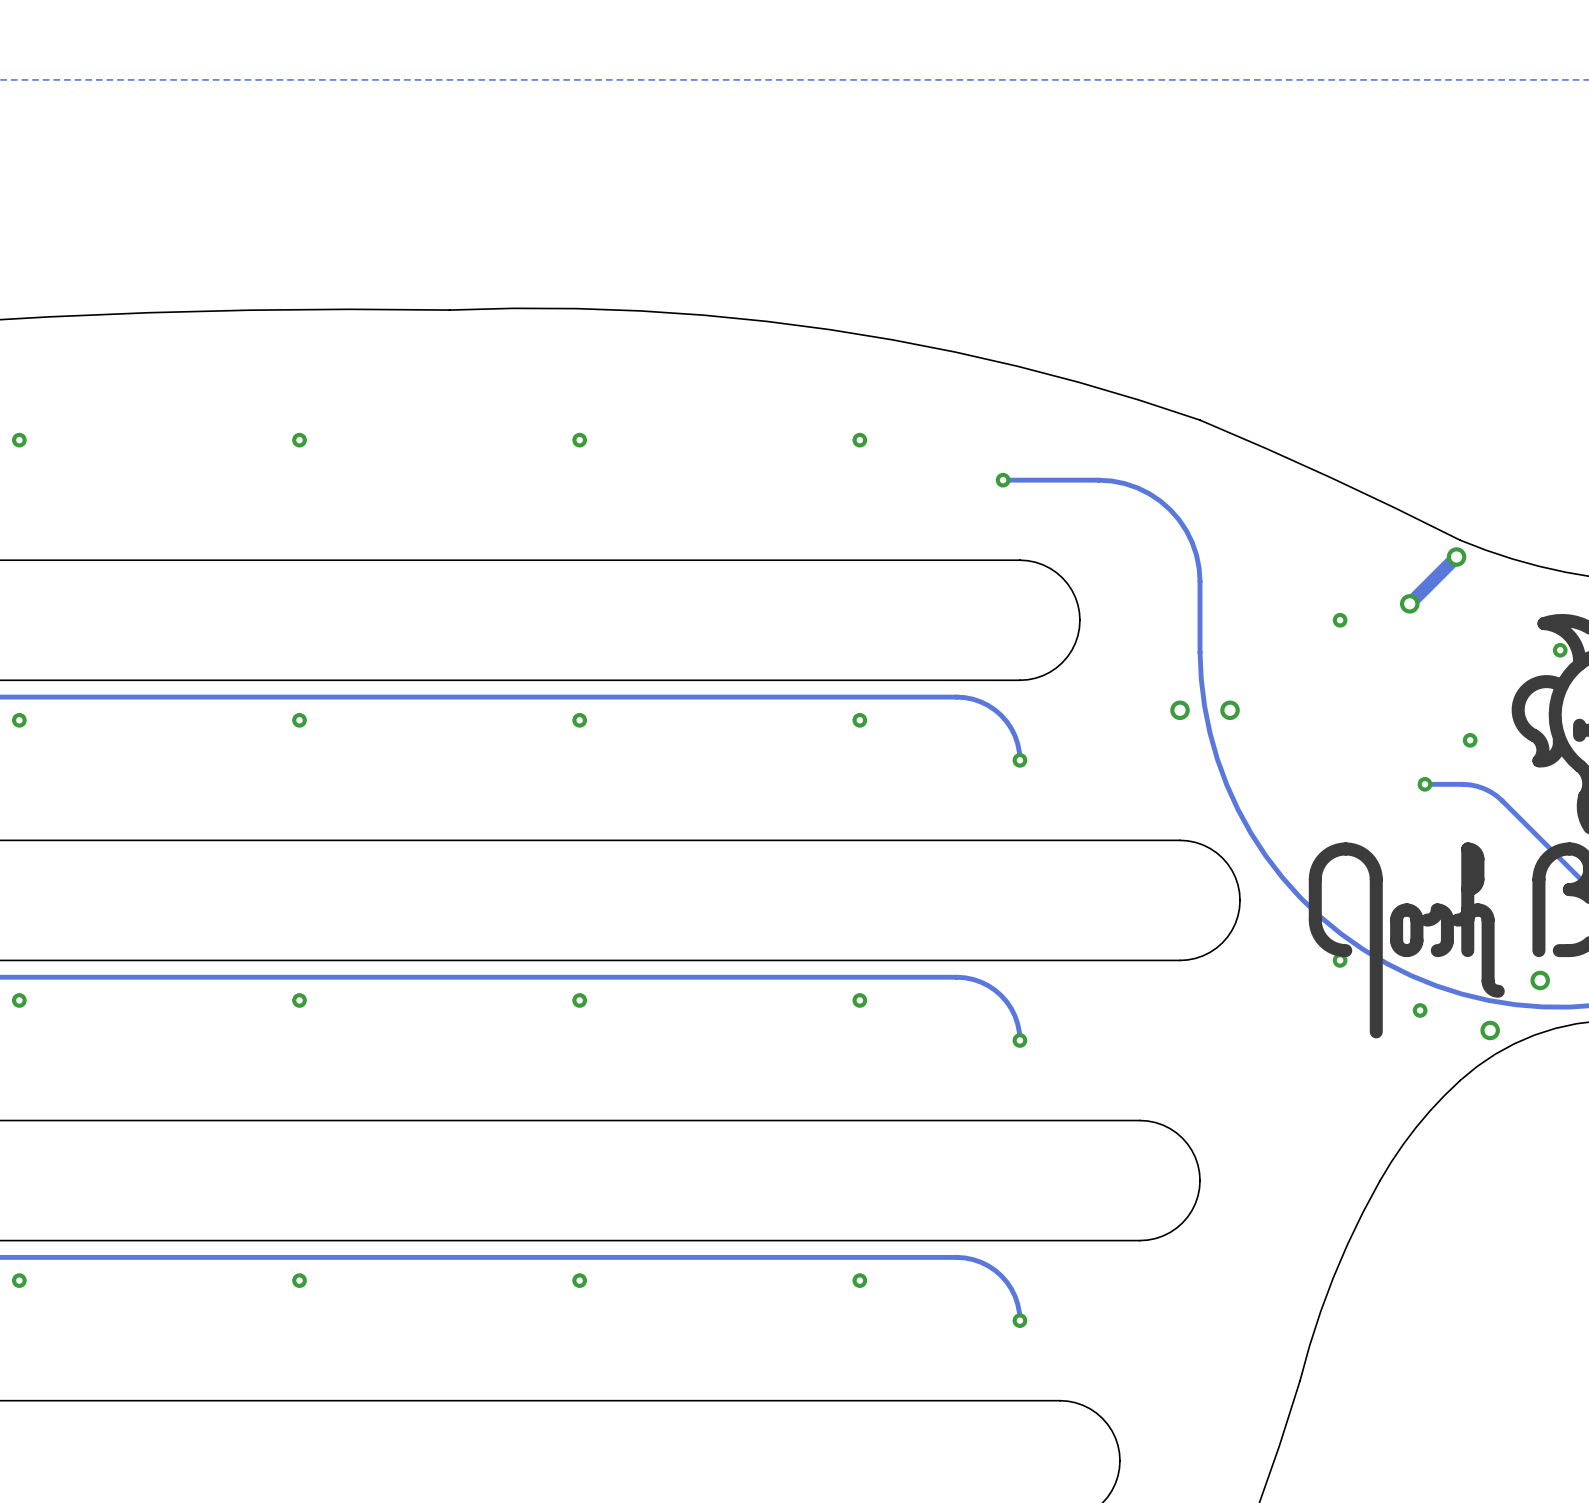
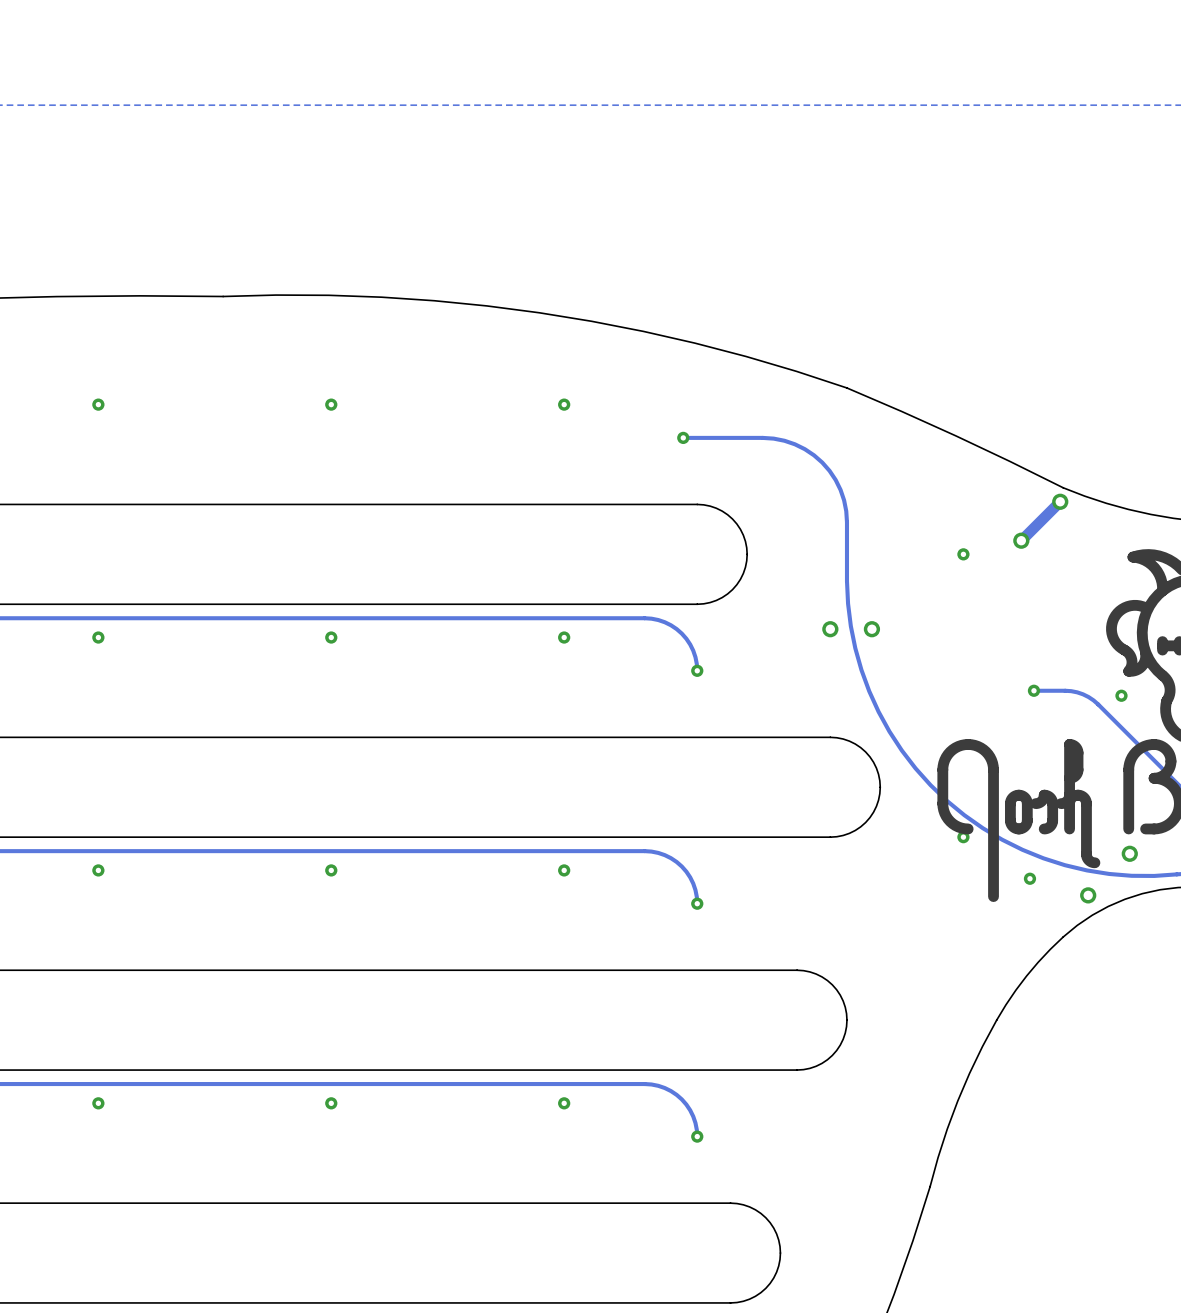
via: (1560, 650) -> none
via: (1470, 740) -> none
via: none -> (1121, 695)

